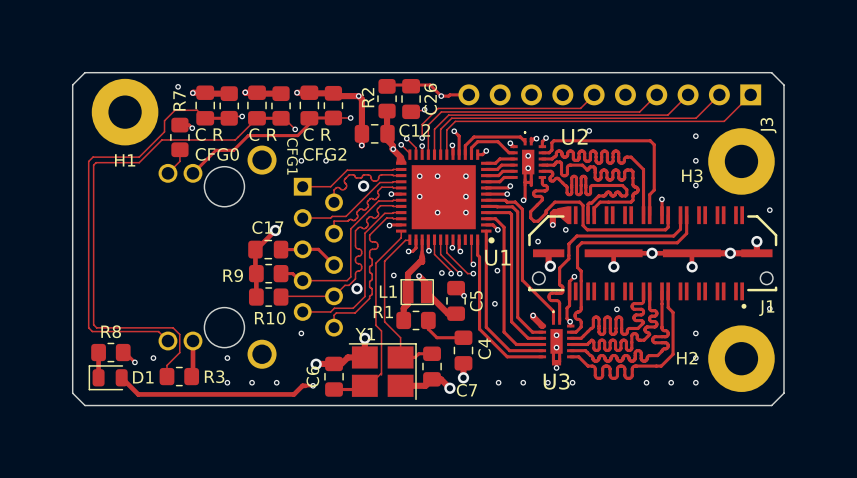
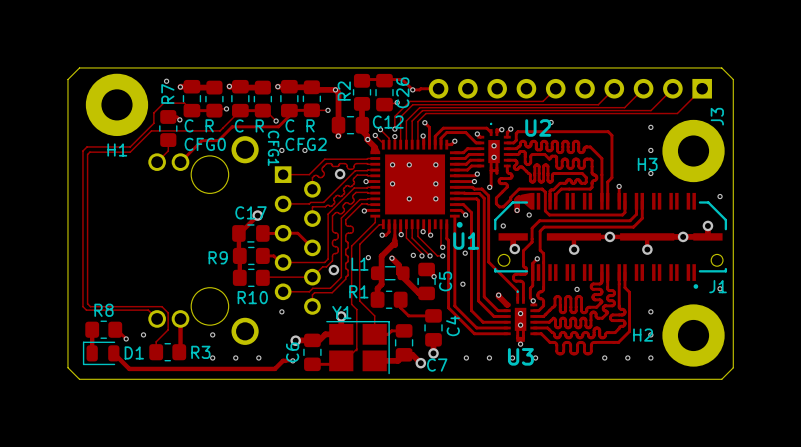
L1 footprint: [400, 279, 434, 306] -> [370, 266, 410, 281]

